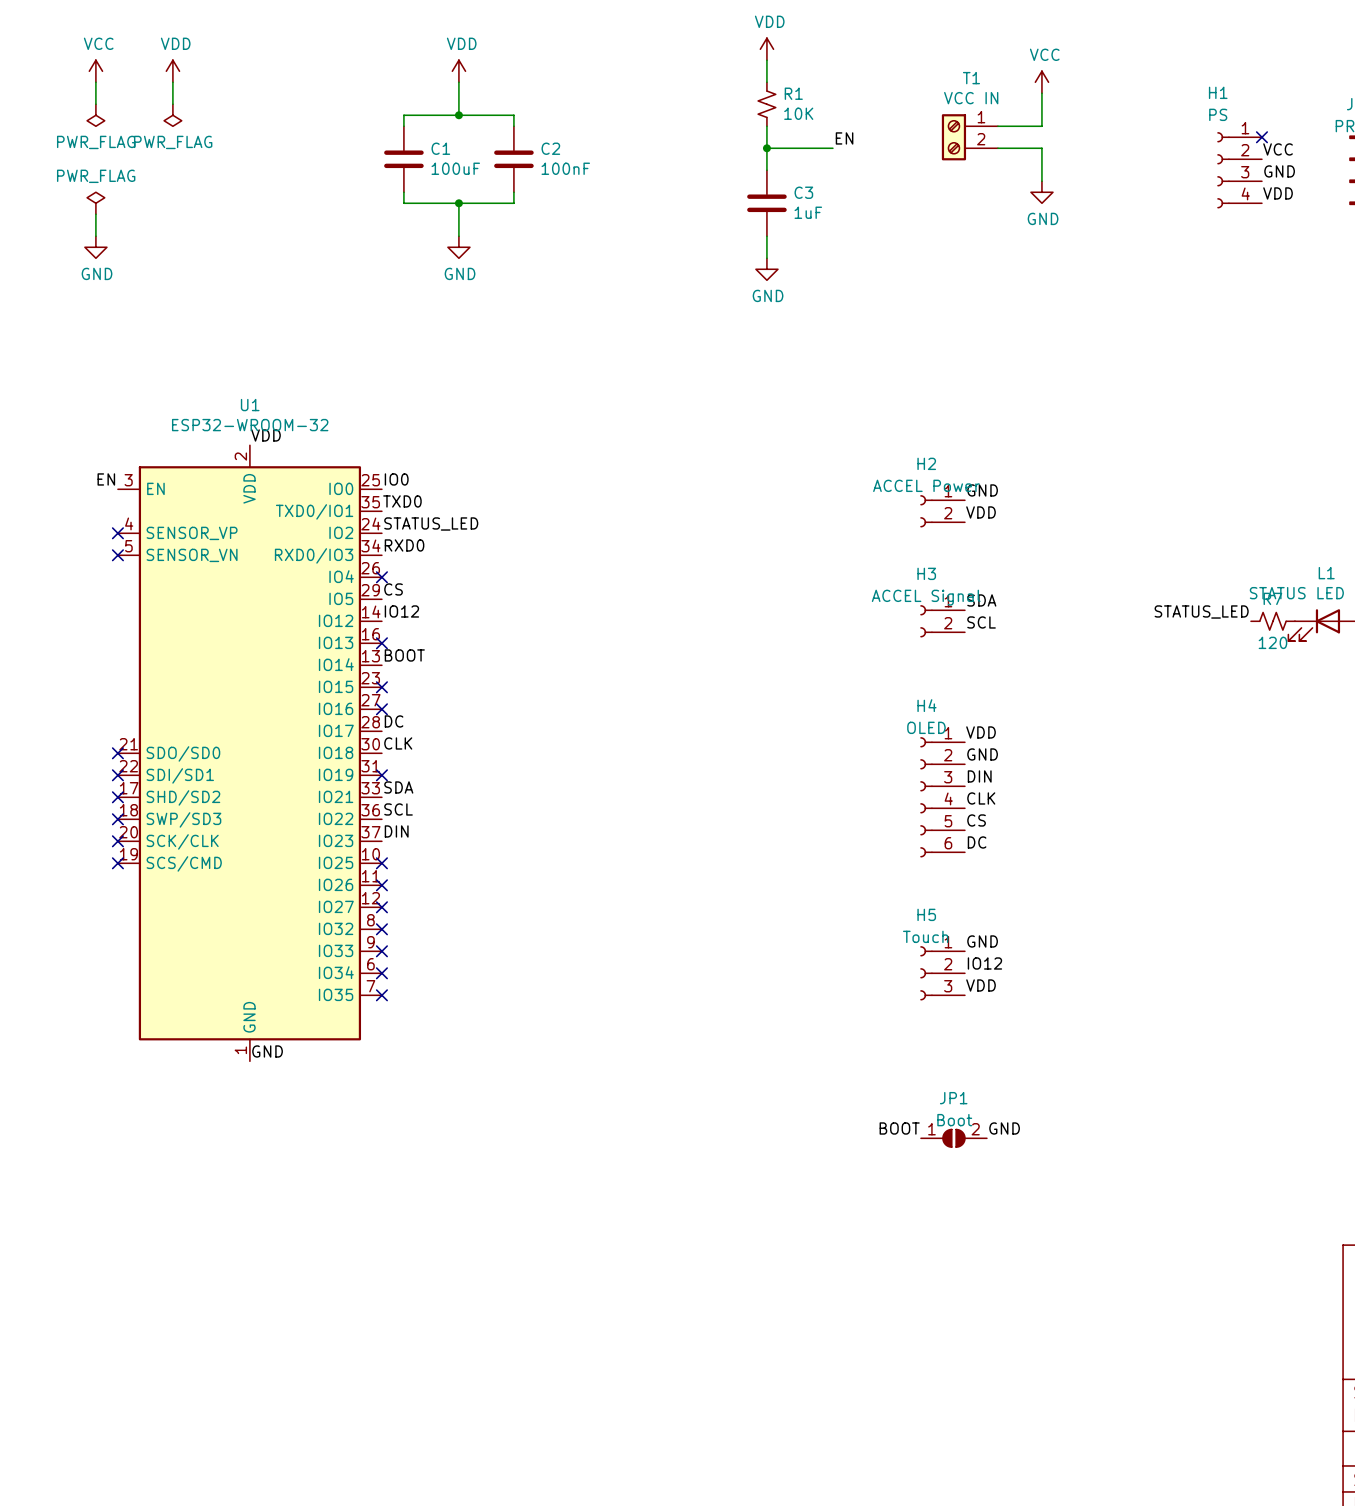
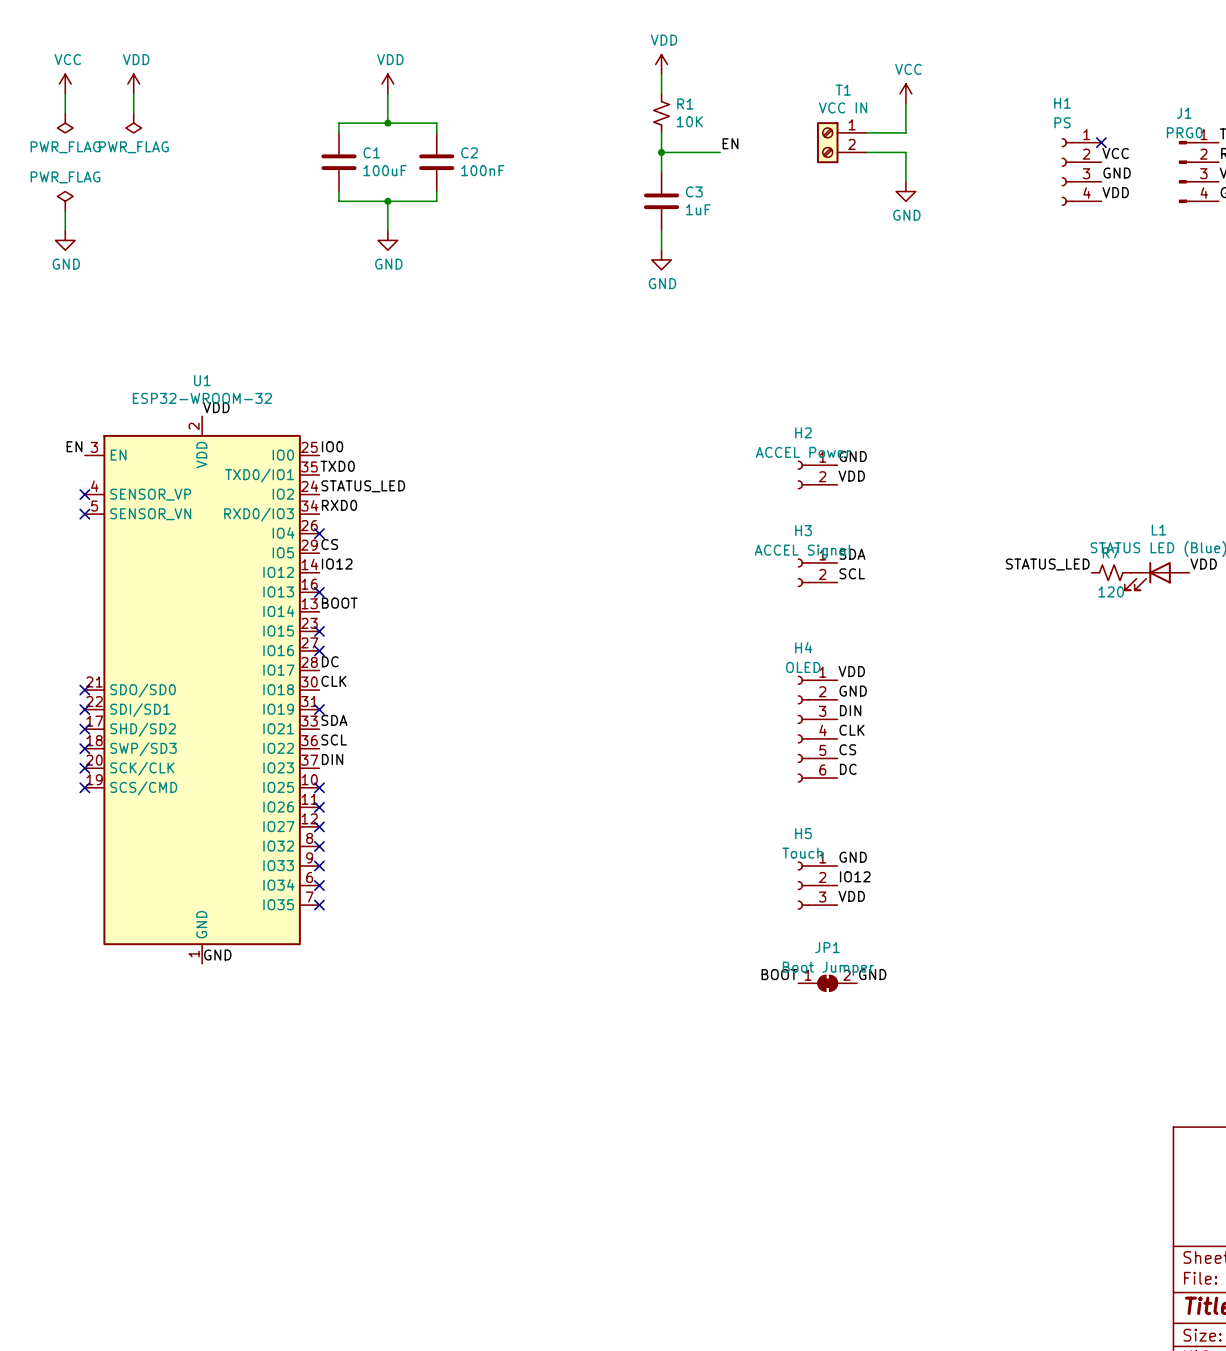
JP1 value: Boot (954, 1120) -> Boot Jumper (828, 968)
label position: BOOT (899, 1128) -> BOOT (779, 974)
label position: GND (1004, 1128) -> GND (872, 974)
JP1 symbol: [920, 1129, 987, 1148] -> [798, 975, 858, 992]

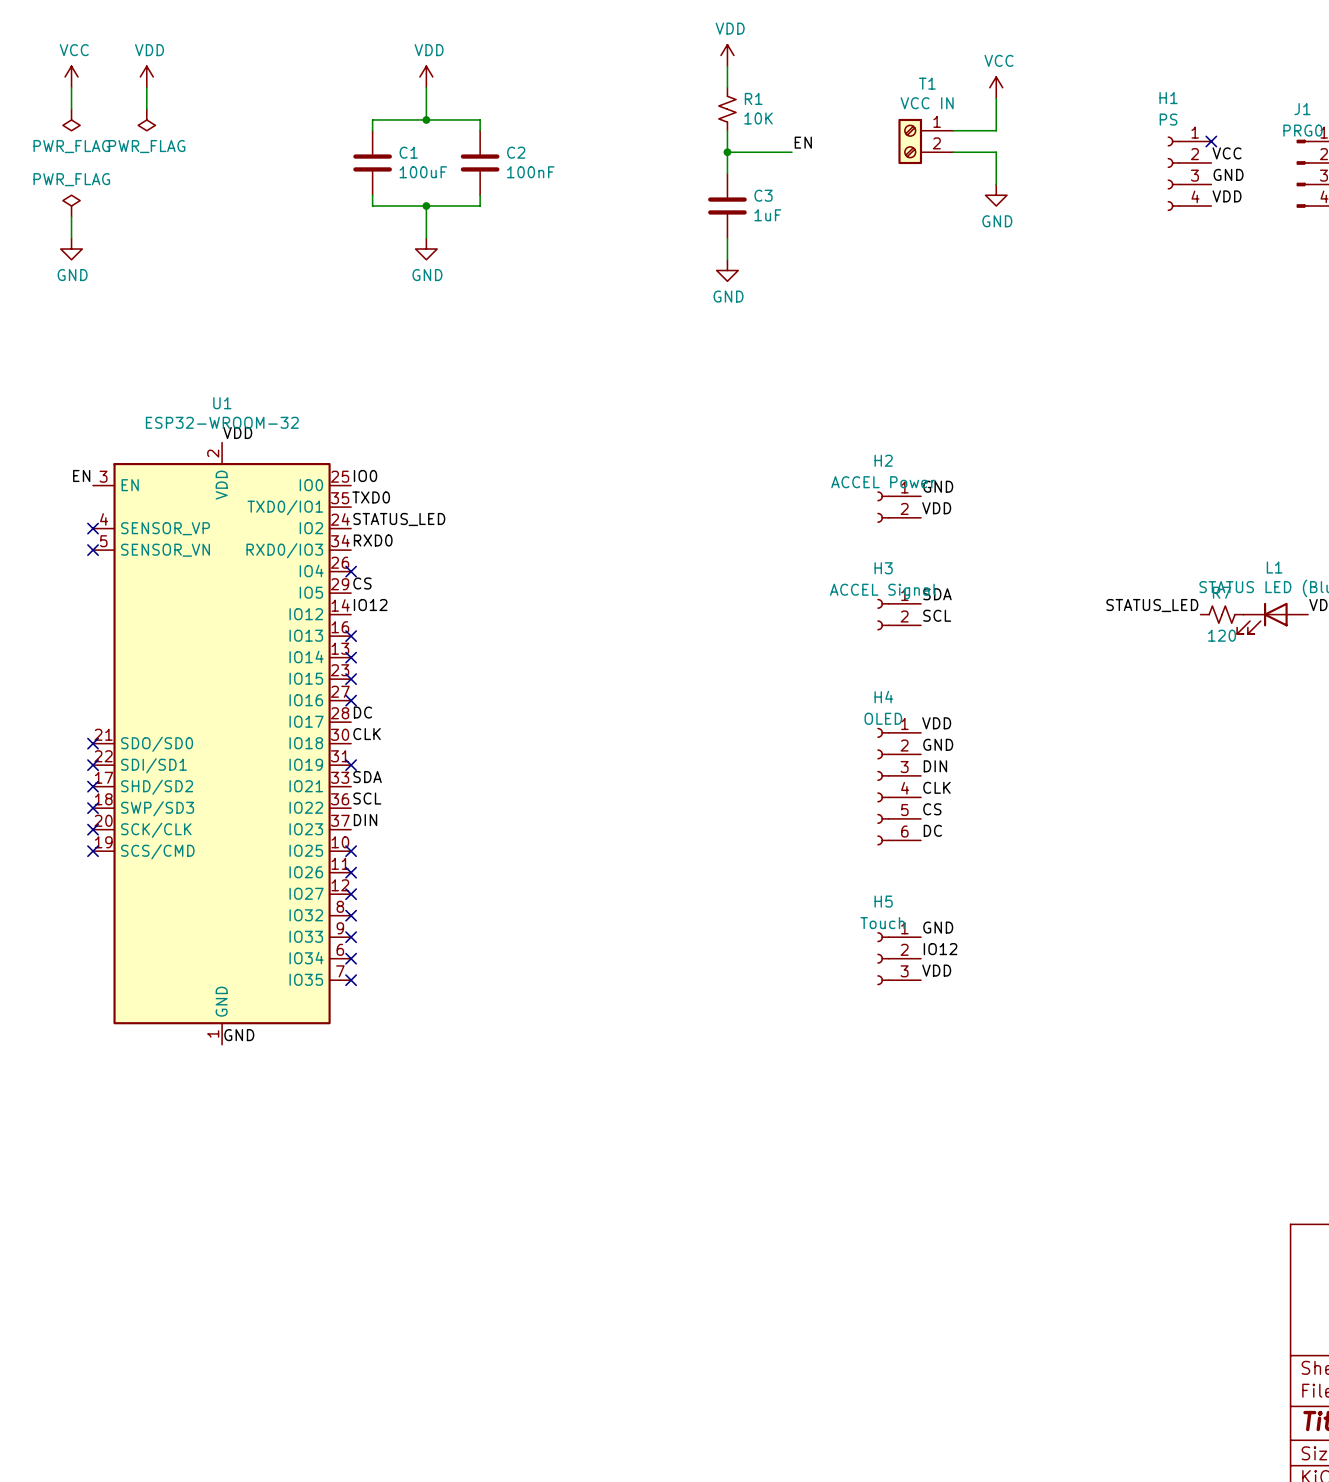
label: BOOT (339, 603) -> none
no-connect mark: none -> (351, 657)
label: BOOT (779, 974) -> none
label: GND (872, 974) -> none
JP1: Boot Jumper (827, 983) -> none

